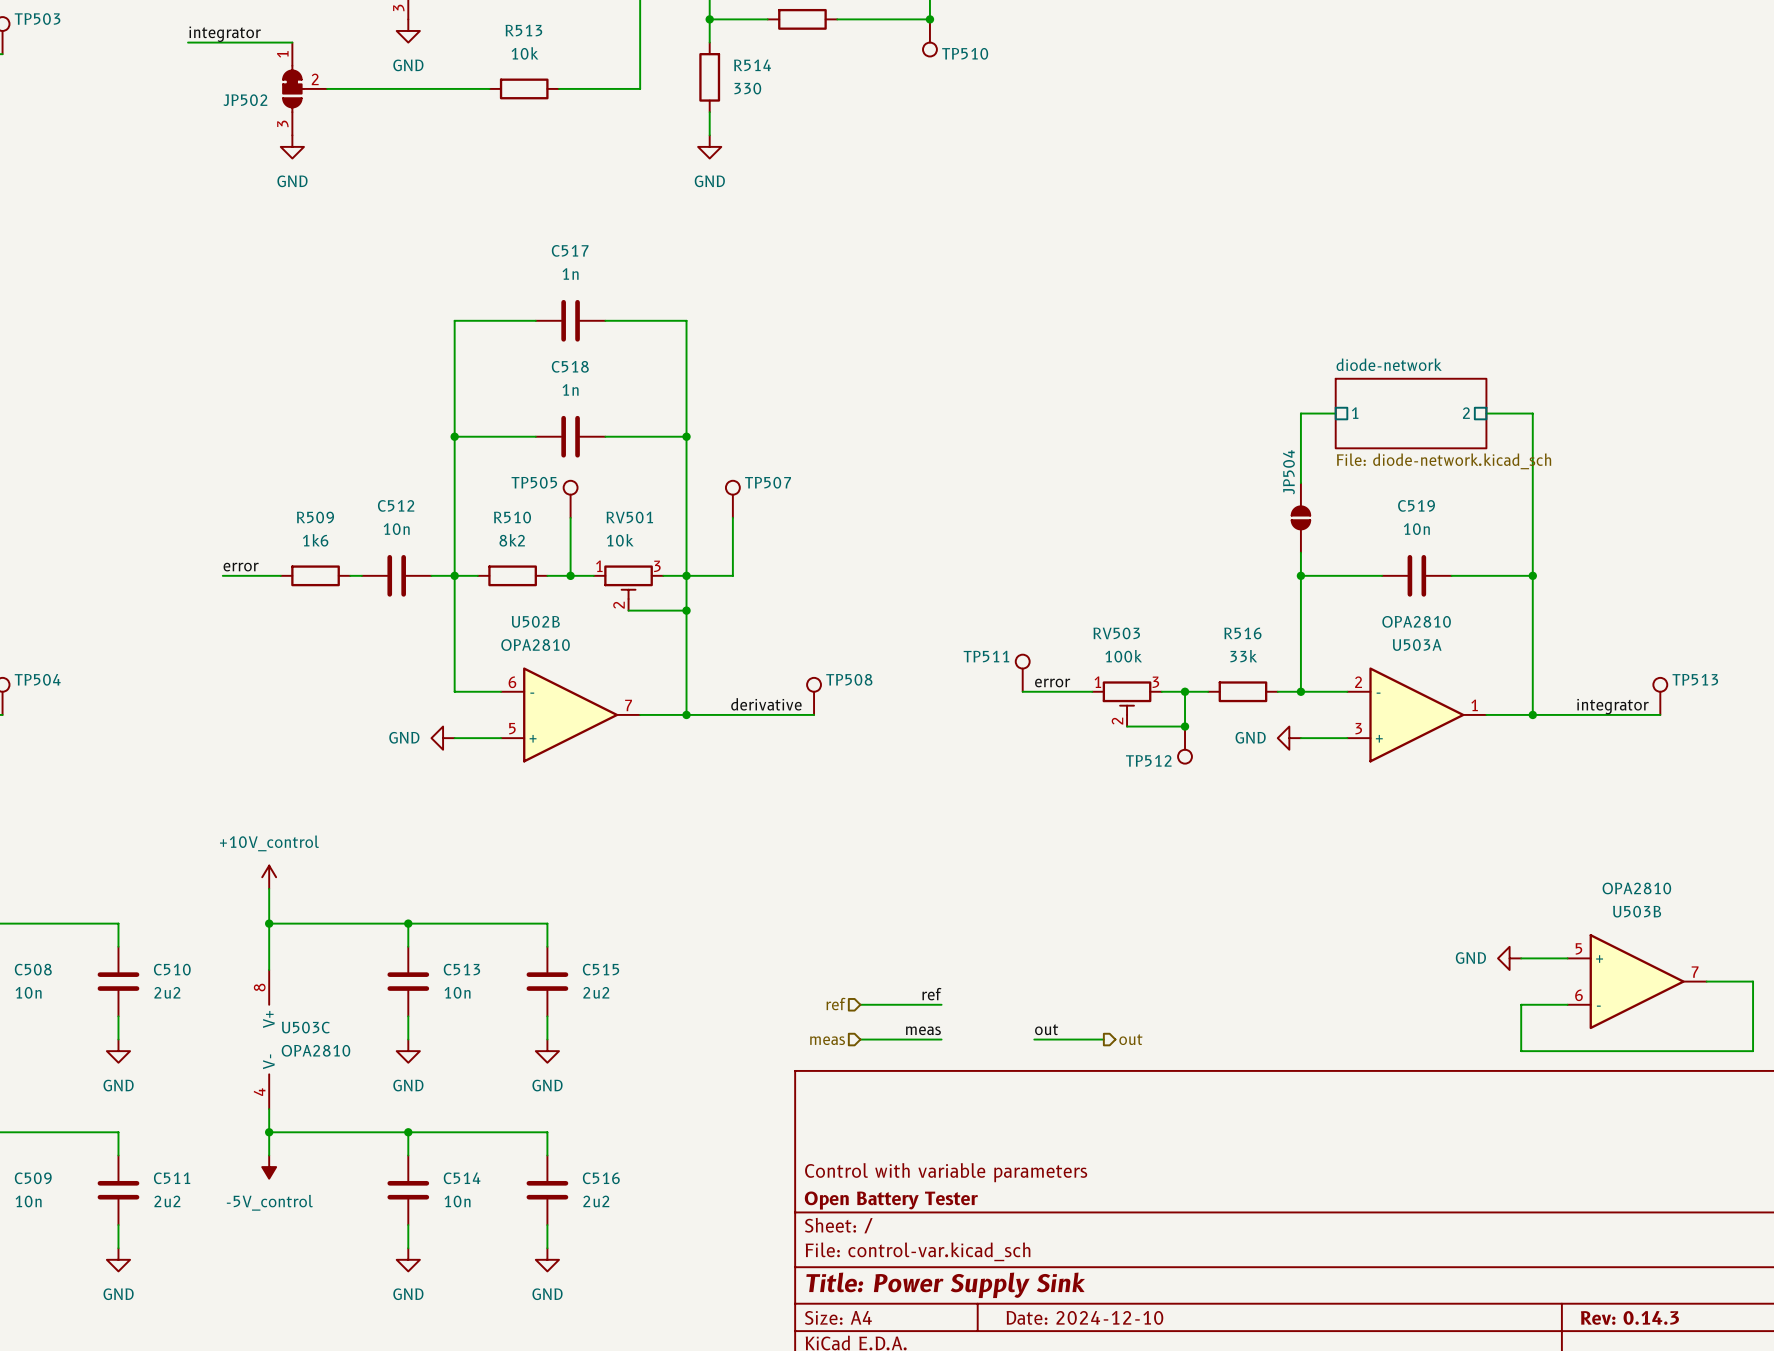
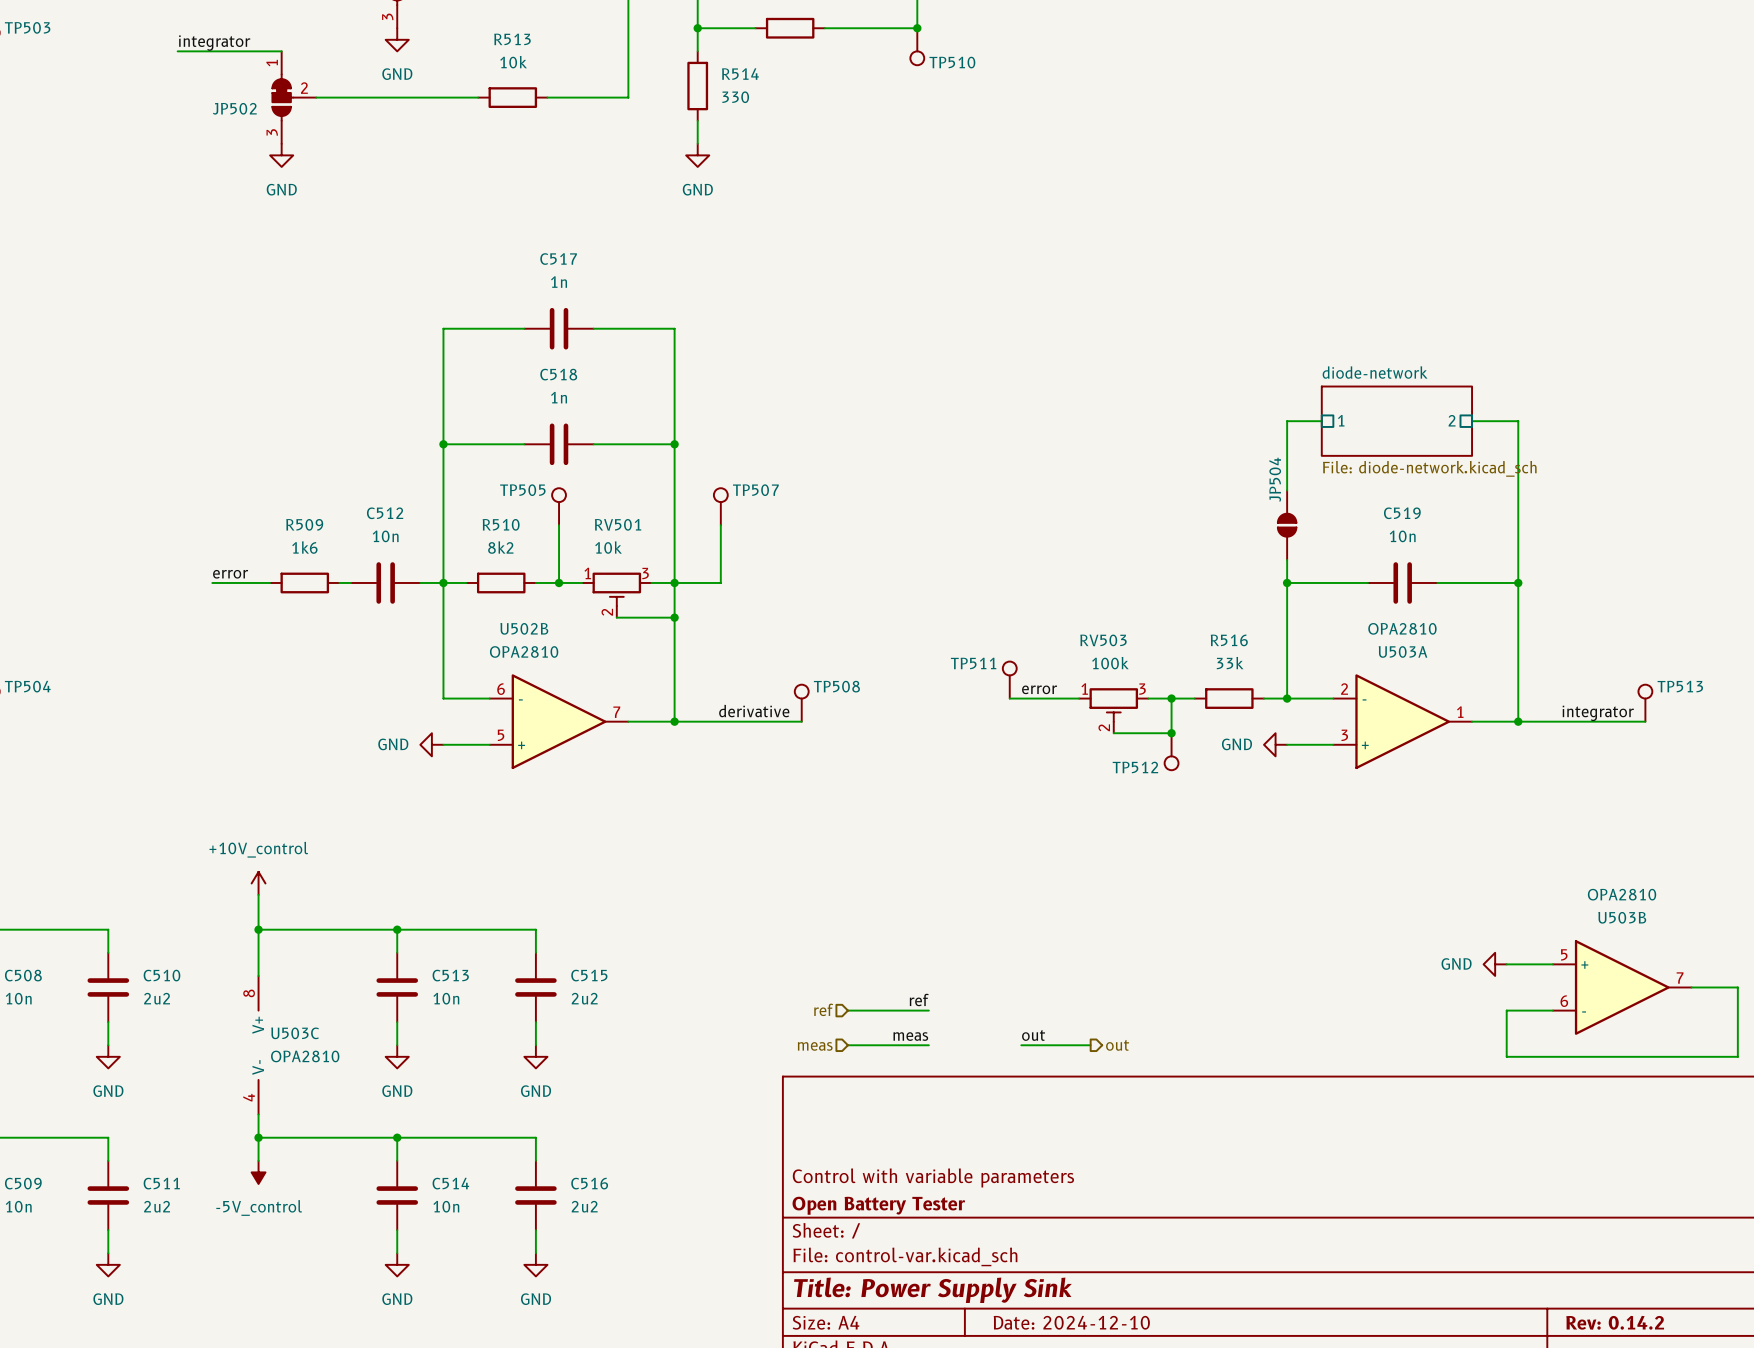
title block: Rev: 0.14.3 (1629, 1317) -> Rev: 0.14.2 (1615, 1322)

